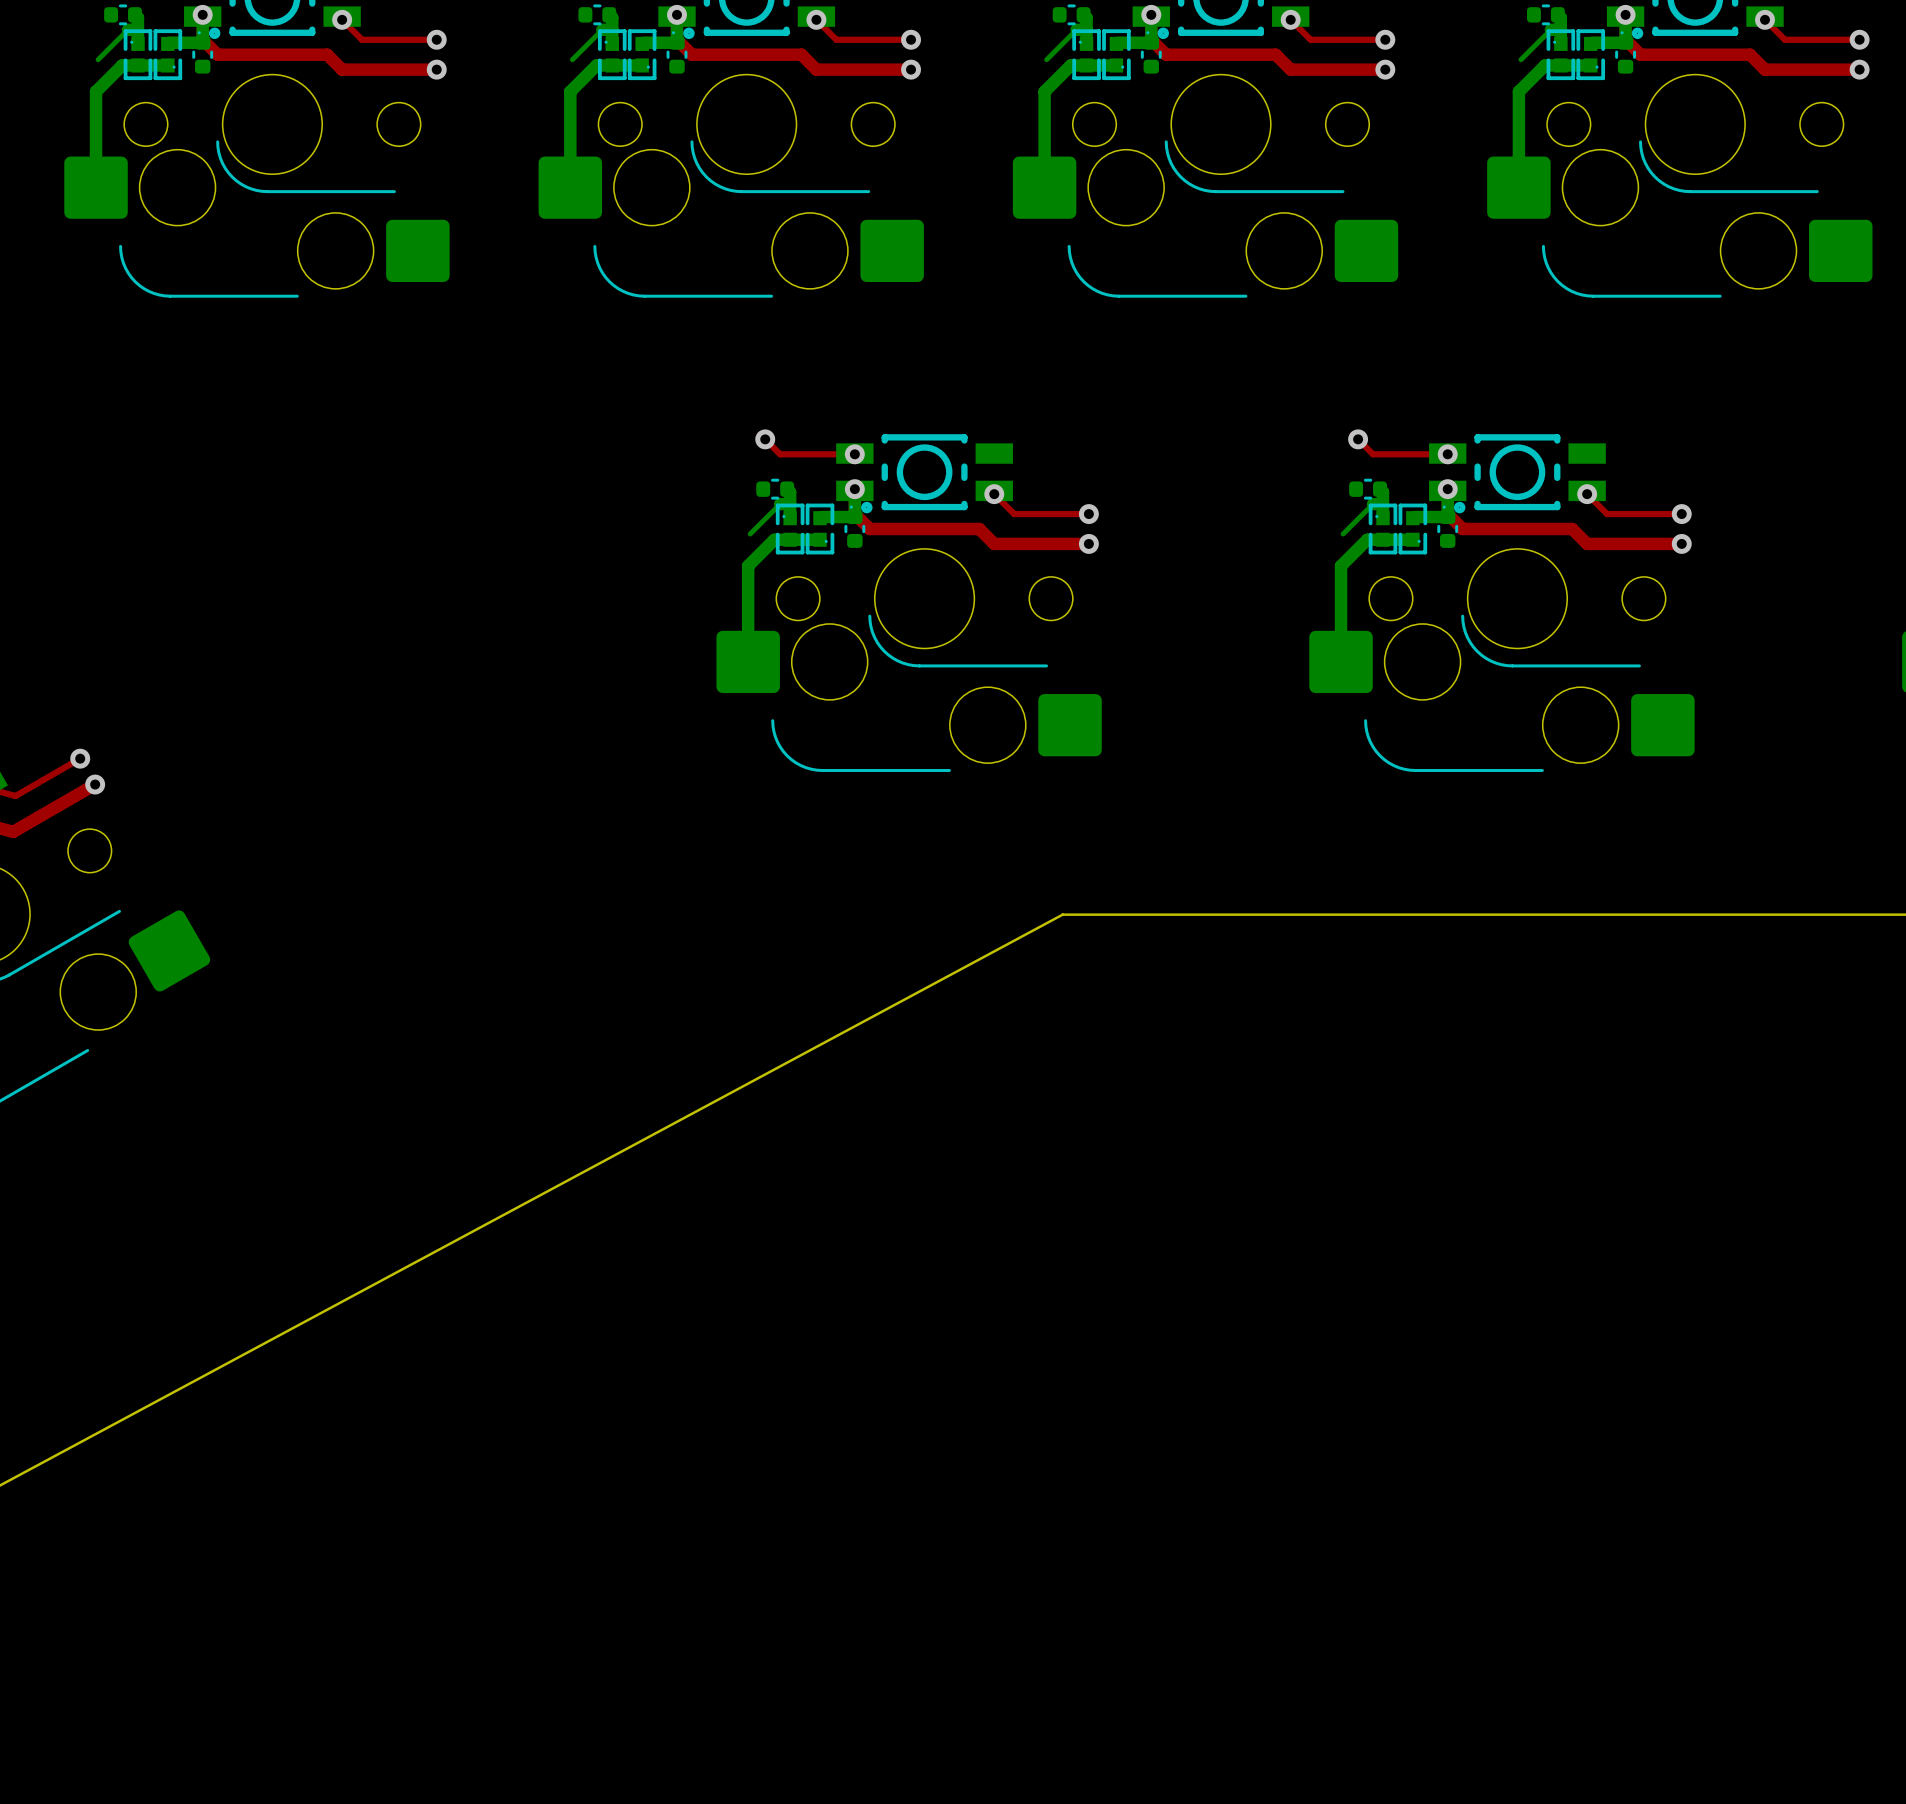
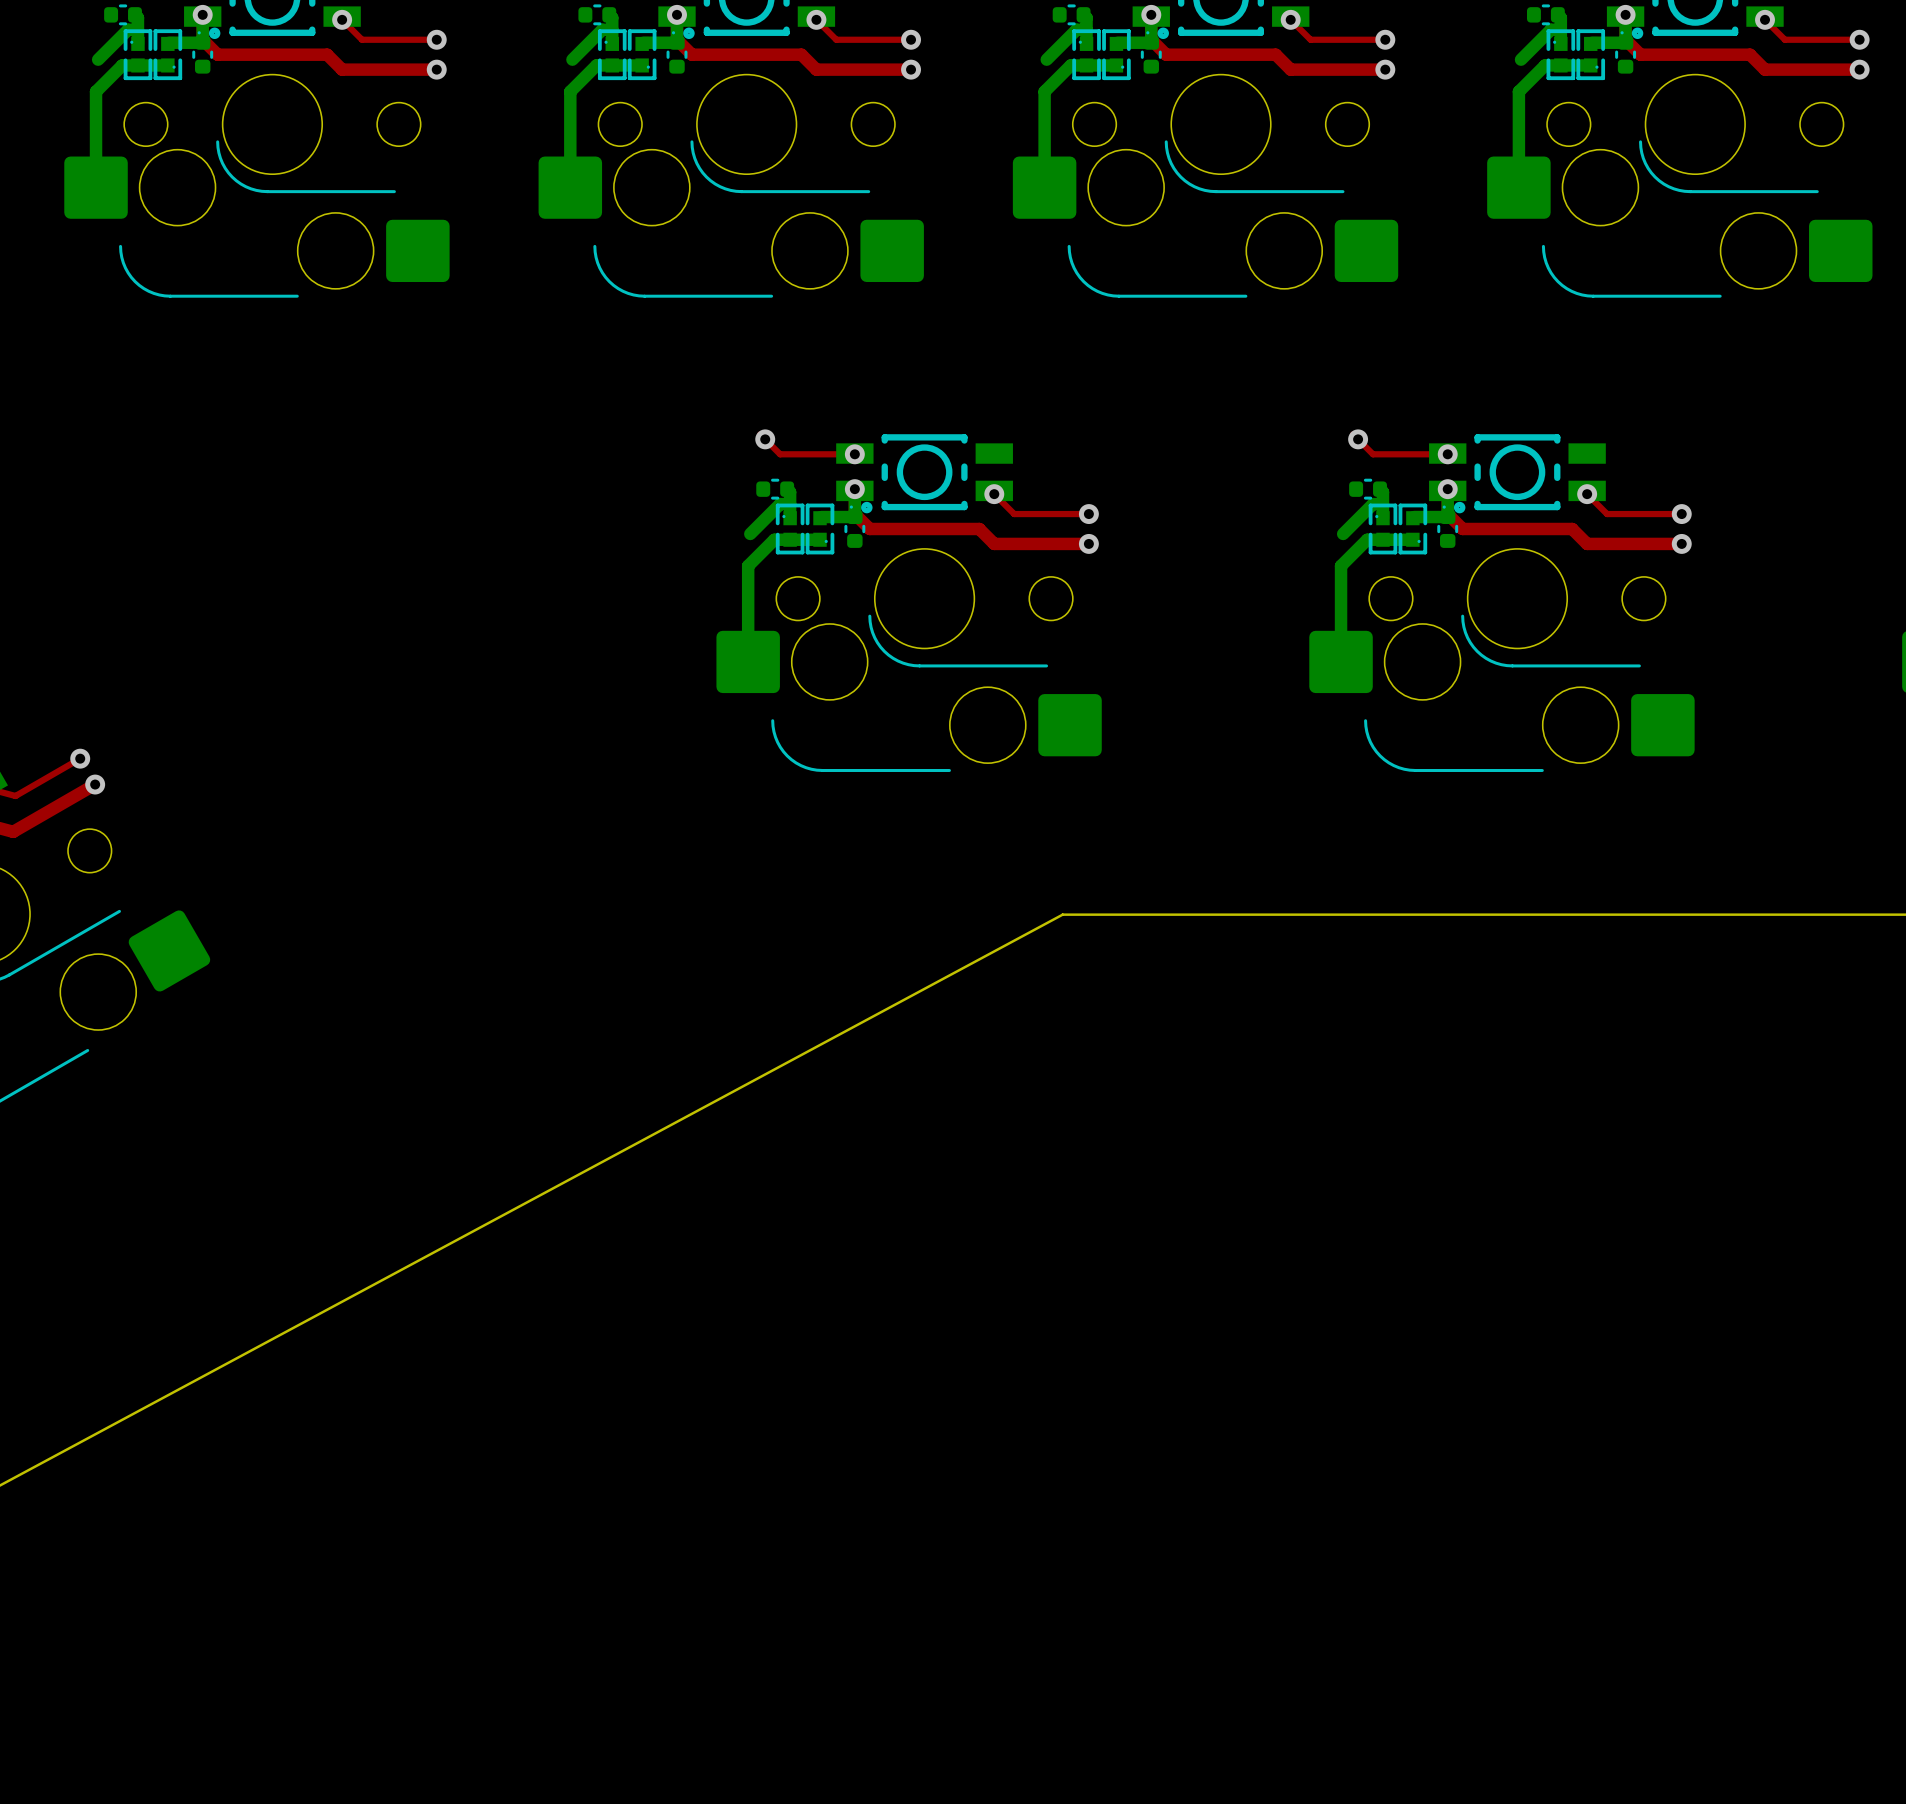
bottom track width: thin (128, 29) (98, 59) -> thick (128, 29) (98, 59)
bottom track width: thin (602, 29) (572, 59) -> thick (602, 29) (572, 59)
bottom track width: thin (1076, 29) (1046, 59) -> thick (1076, 29) (1046, 59)
bottom track width: thin (1550, 29) (1521, 59) -> thick (1550, 29) (1521, 59)
bottom track width: thin (780, 504) (750, 533) -> thick (780, 504) (750, 533)
bottom track width: thin (1373, 504) (1343, 533) -> thick (1373, 504) (1343, 533)

